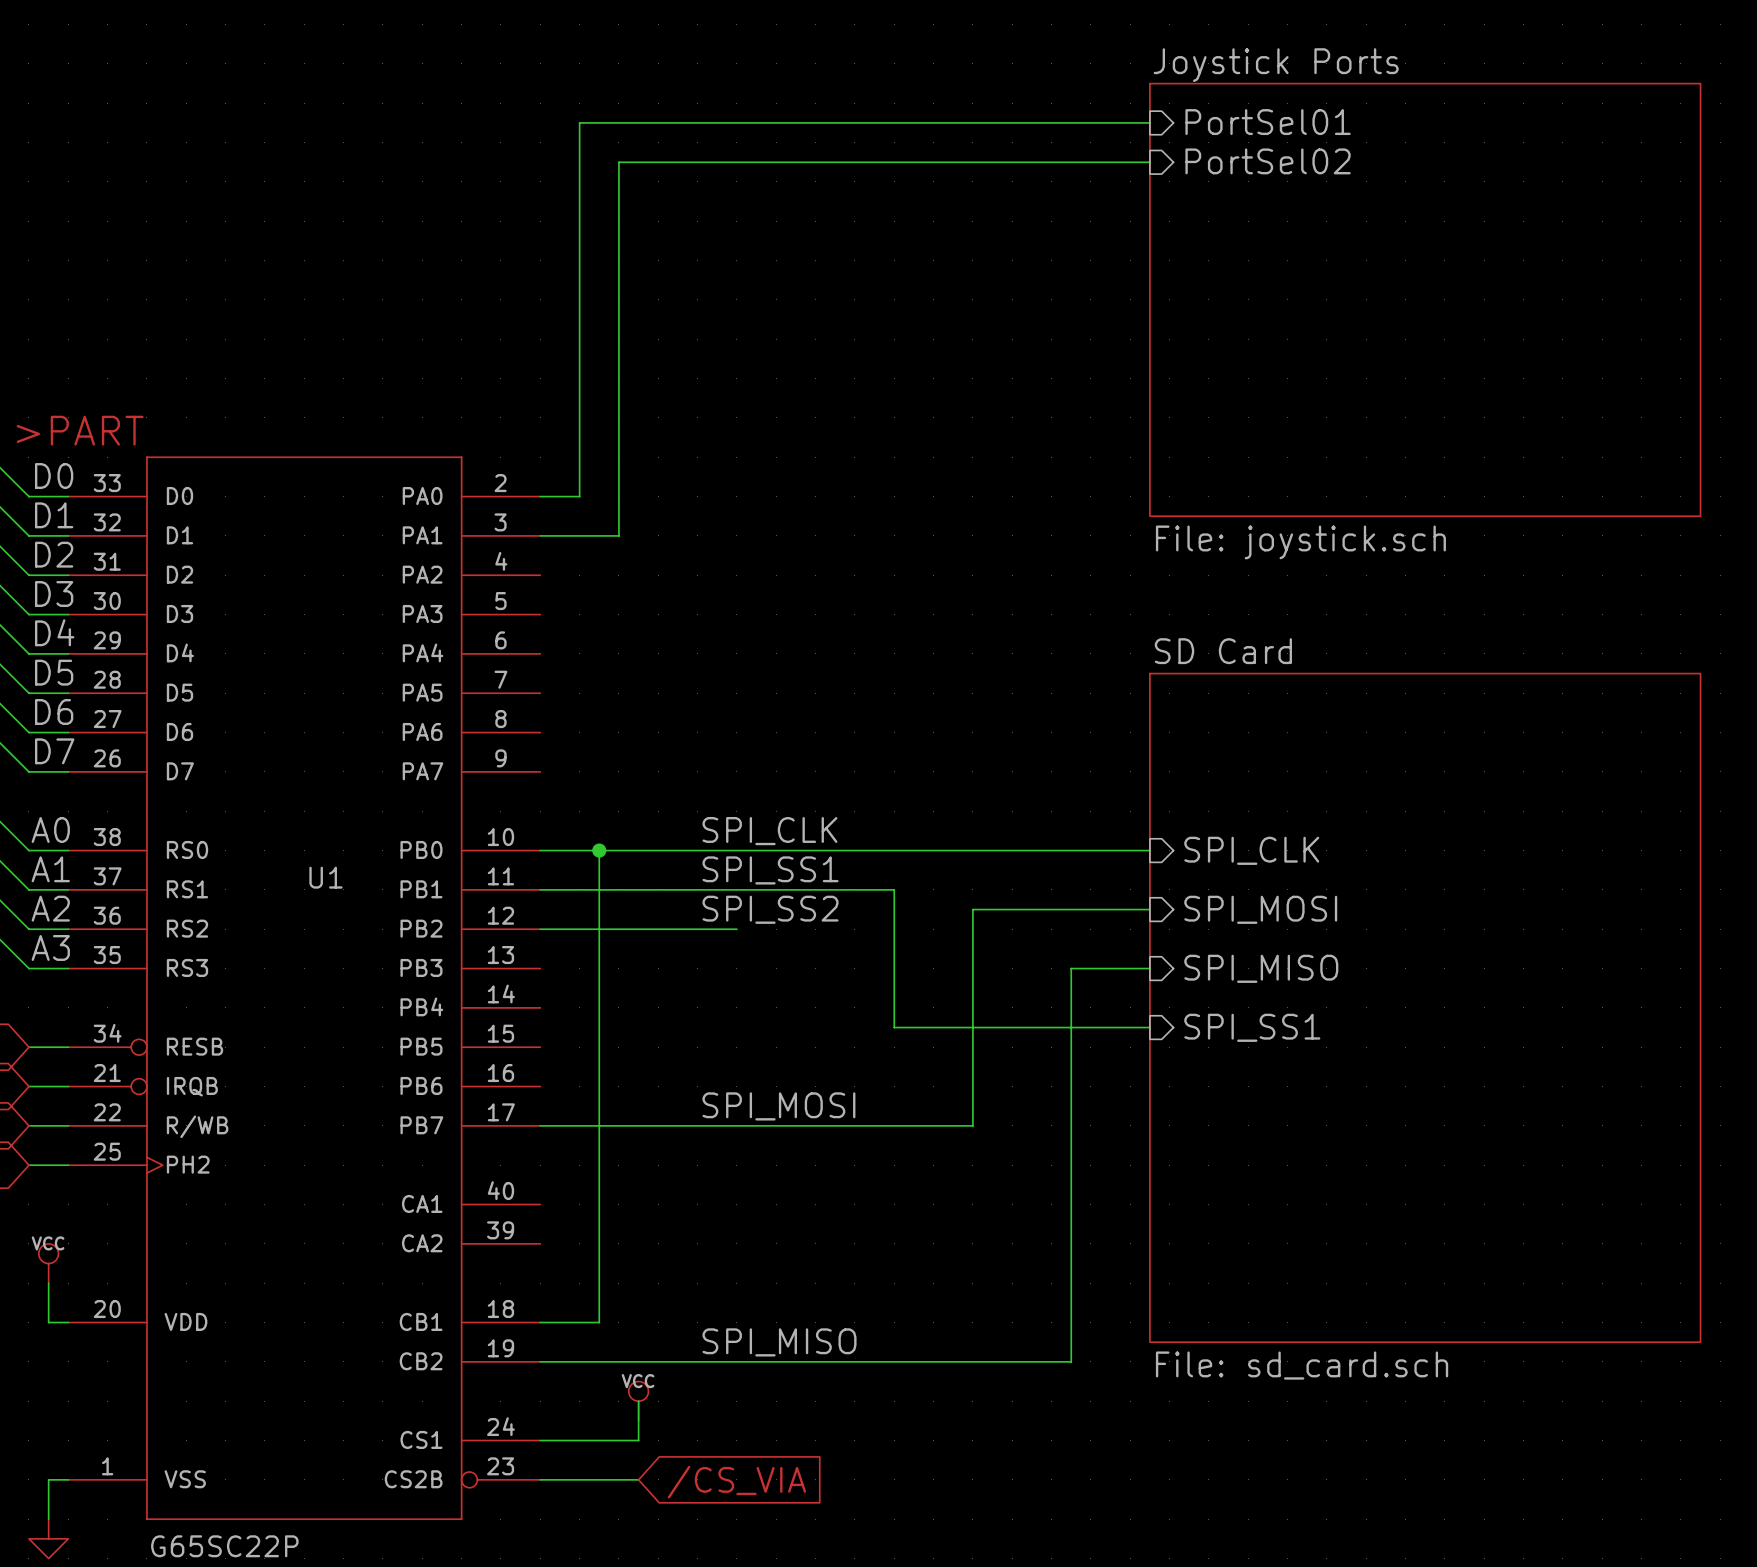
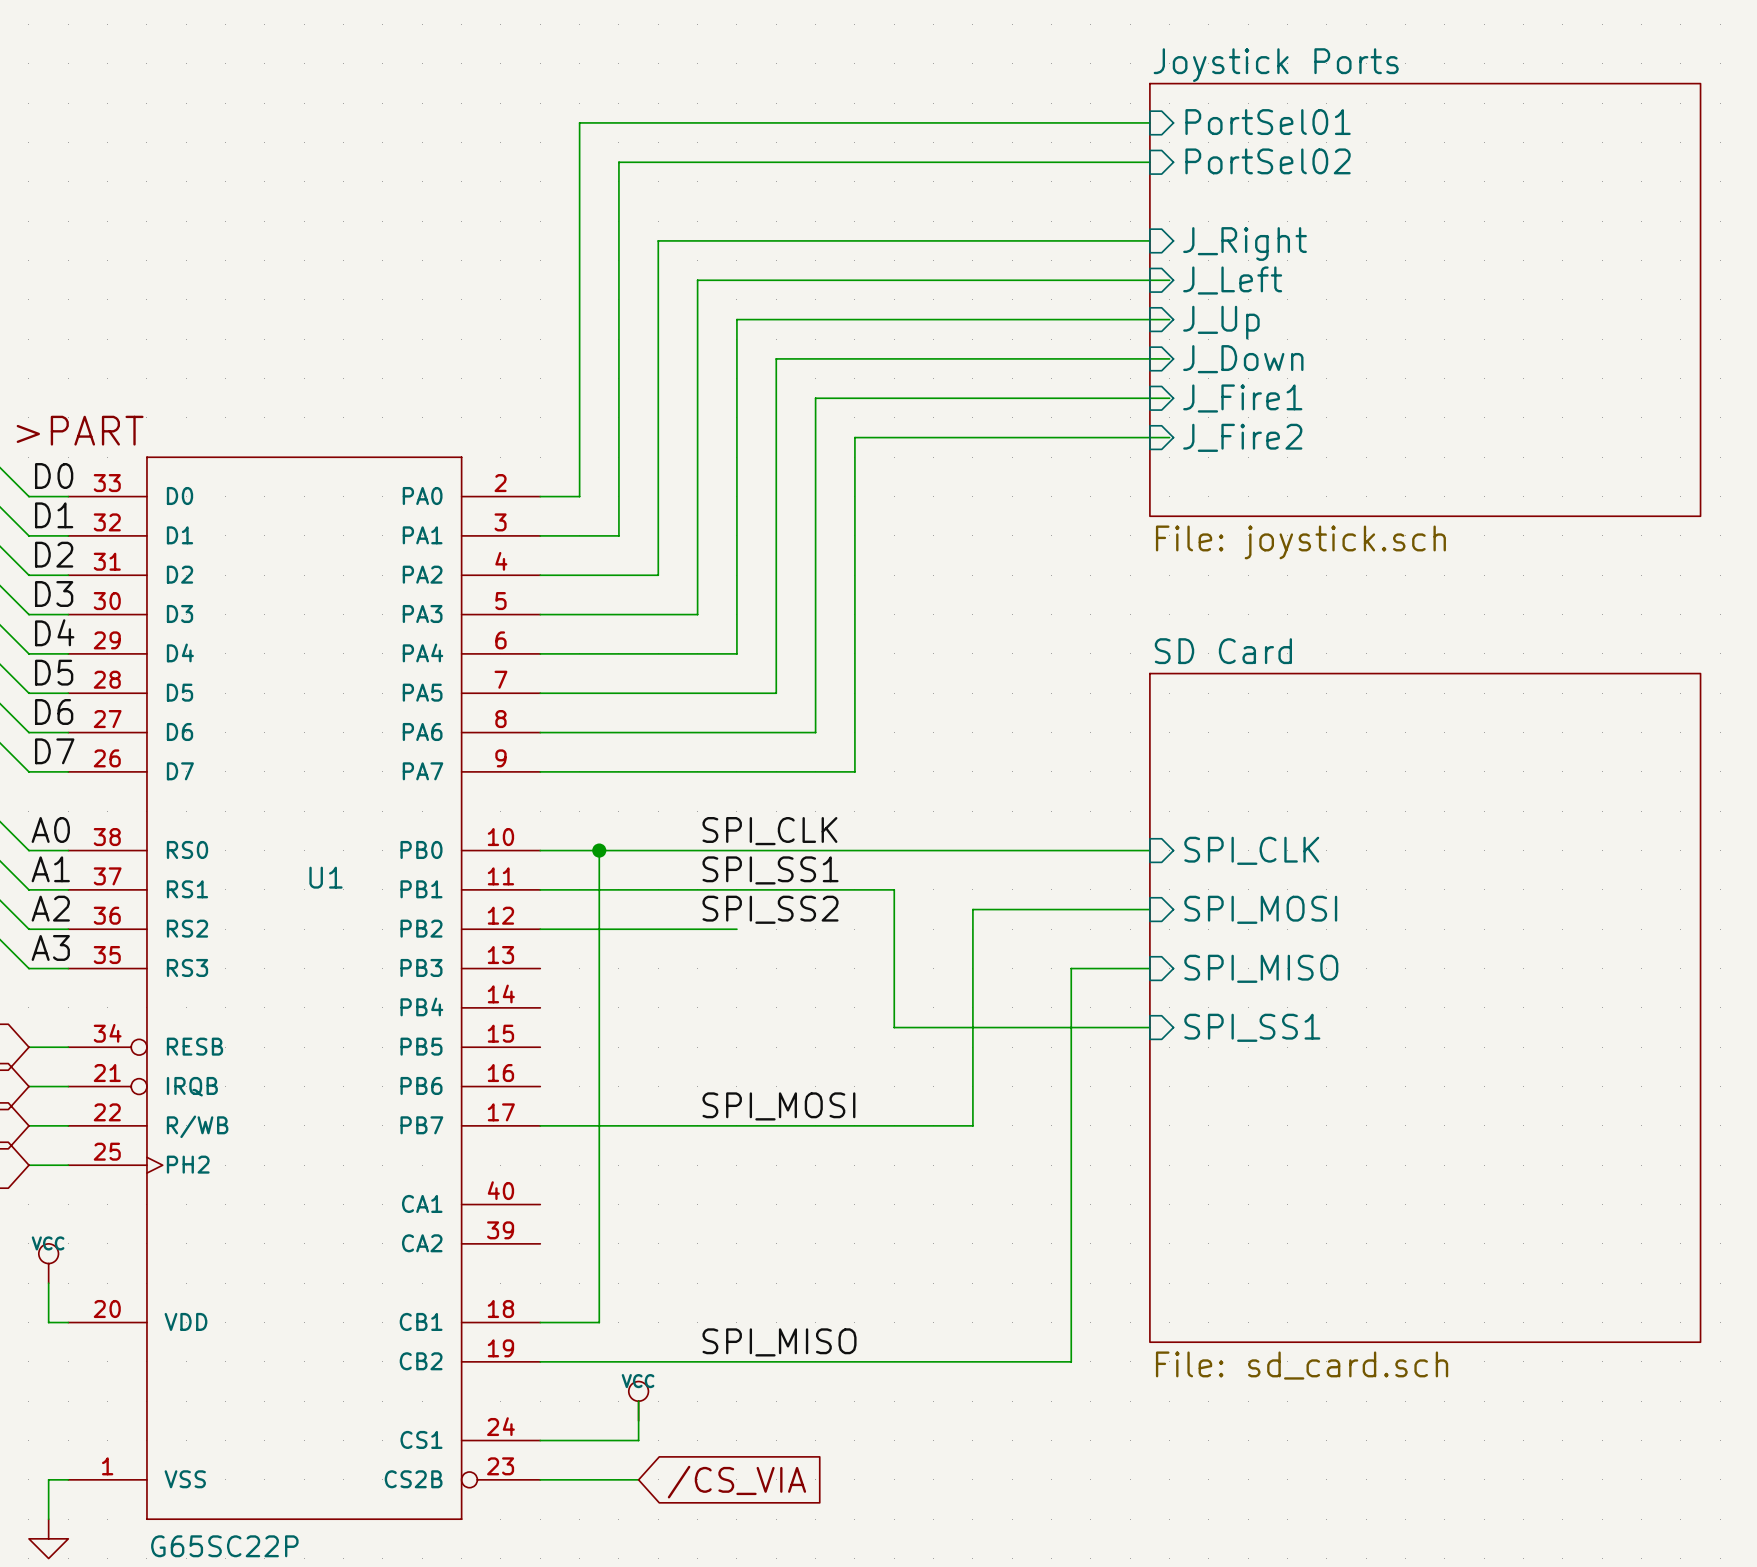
wire: none -> (1149, 240) (658, 240) (658, 575) (540, 575)
sheet pin: none -> J_Right (1245, 243)
wire: none -> (1169, 280) (697, 280) (697, 614) (540, 614)
sheet pin: none -> J_Left (1232, 280)
wire: none -> (1169, 319) (736, 319) (736, 653) (540, 653)
sheet pin: none -> J_Up (1221, 322)
wire: none -> (1169, 358) (776, 358) (776, 693) (540, 693)
sheet pin: none -> J_Down (1243, 359)
wire: none -> (1169, 398) (815, 398) (815, 732) (540, 732)
sheet pin: none -> J_Fire1 (1242, 398)
wire: none -> (1169, 437) (854, 437) (854, 771) (540, 771)
sheet pin: none -> J_Fire2 (1242, 437)

